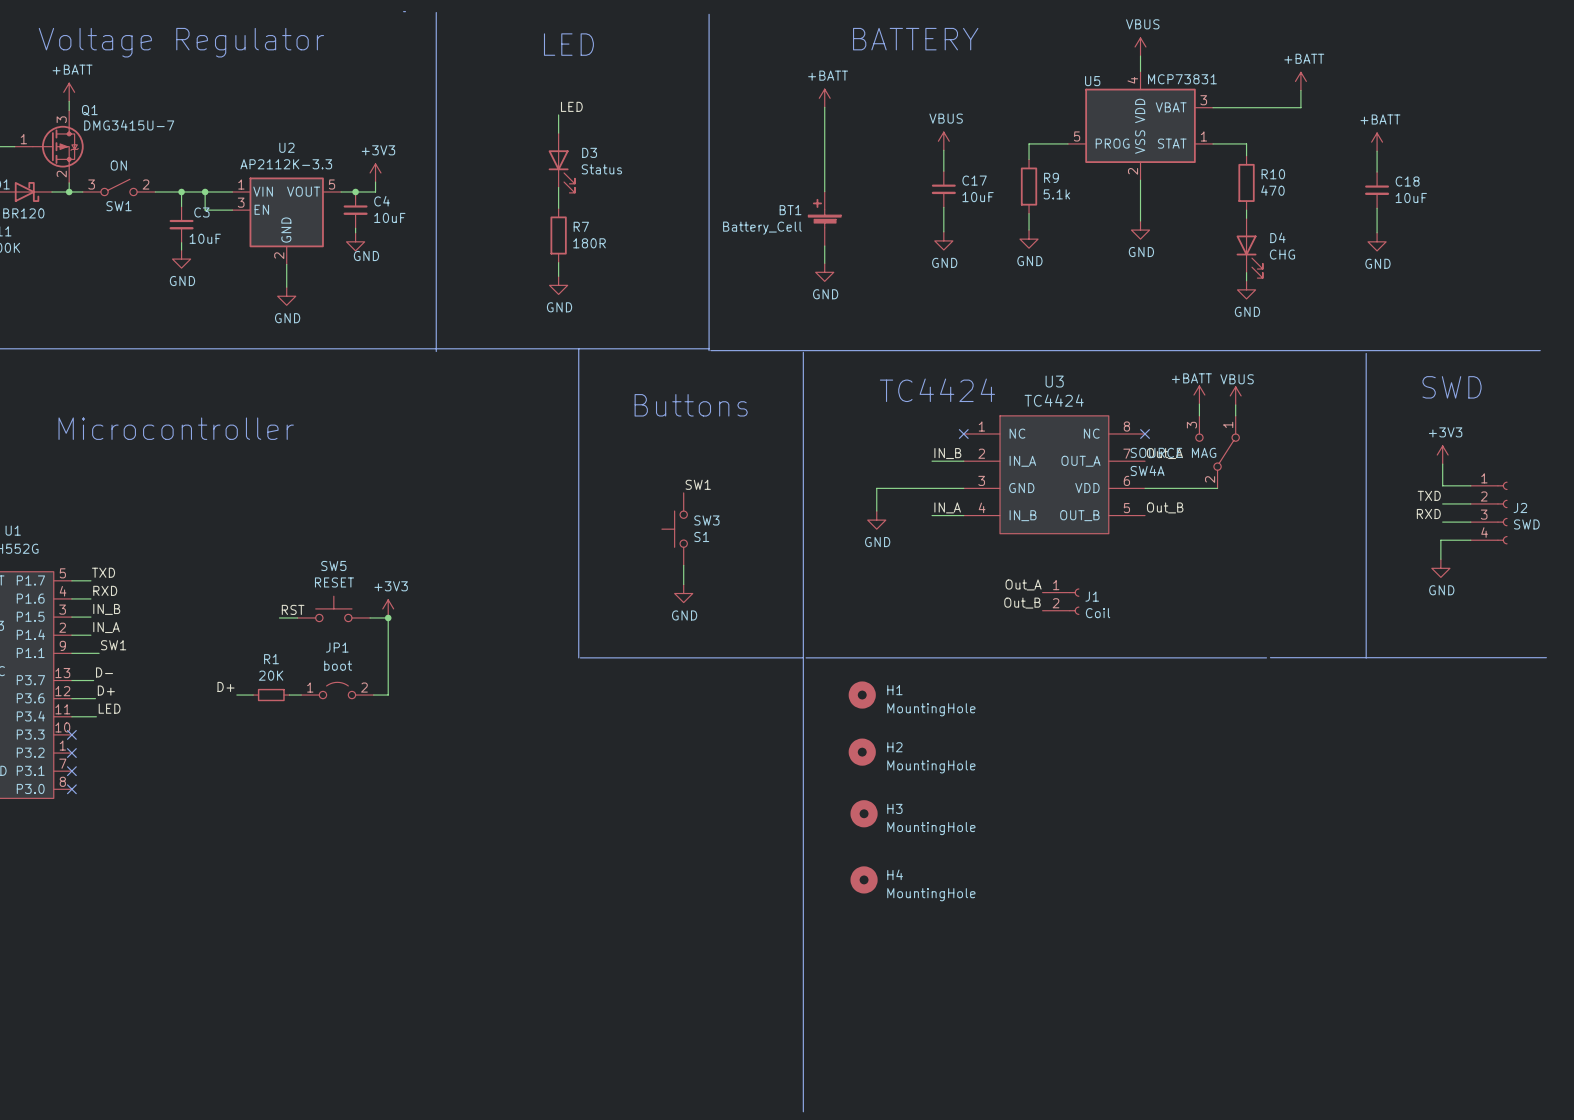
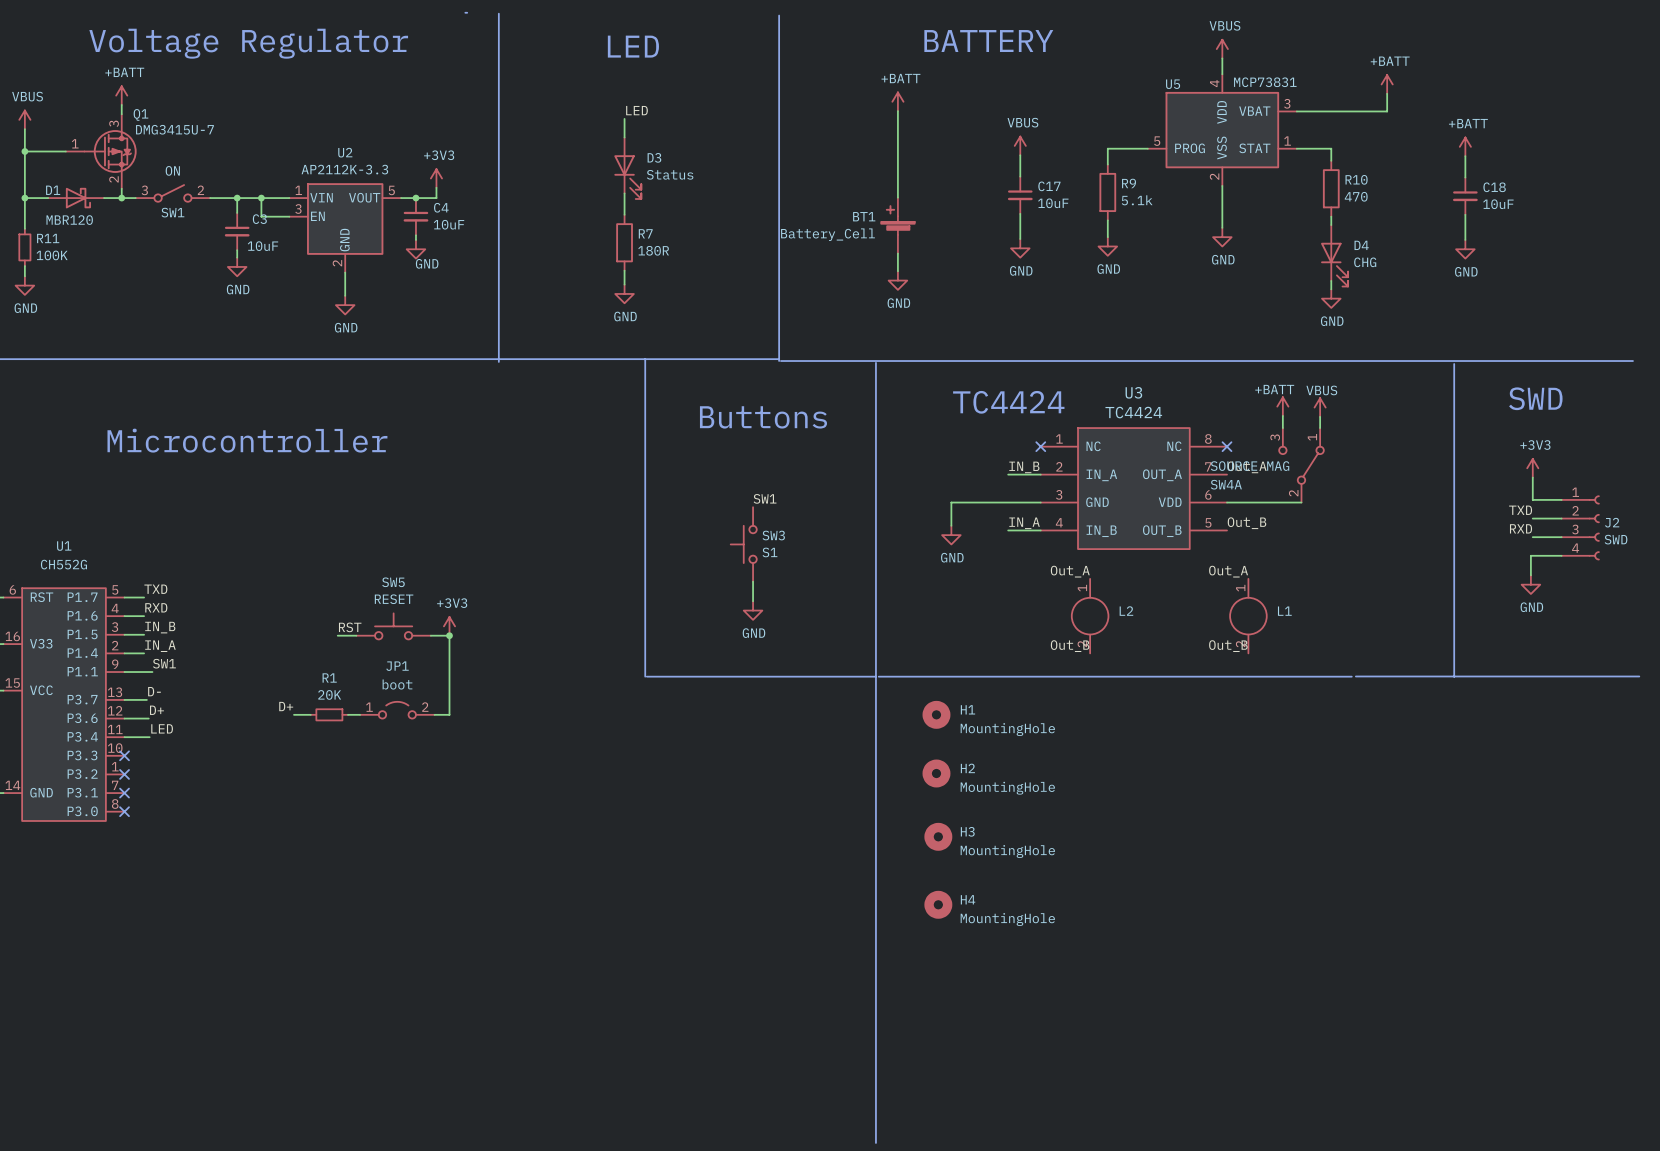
label: none -> Out_A (1228, 571)
label position: Out_A (1023, 584) -> Out_A (1070, 571)
L2: none -> (1090, 616)
L1: none -> (1248, 616)
J1: Coil (1061, 601) -> none
label position: Out_B (1022, 603) -> Out_B (1070, 646)
label: none -> Out_B (1228, 646)

